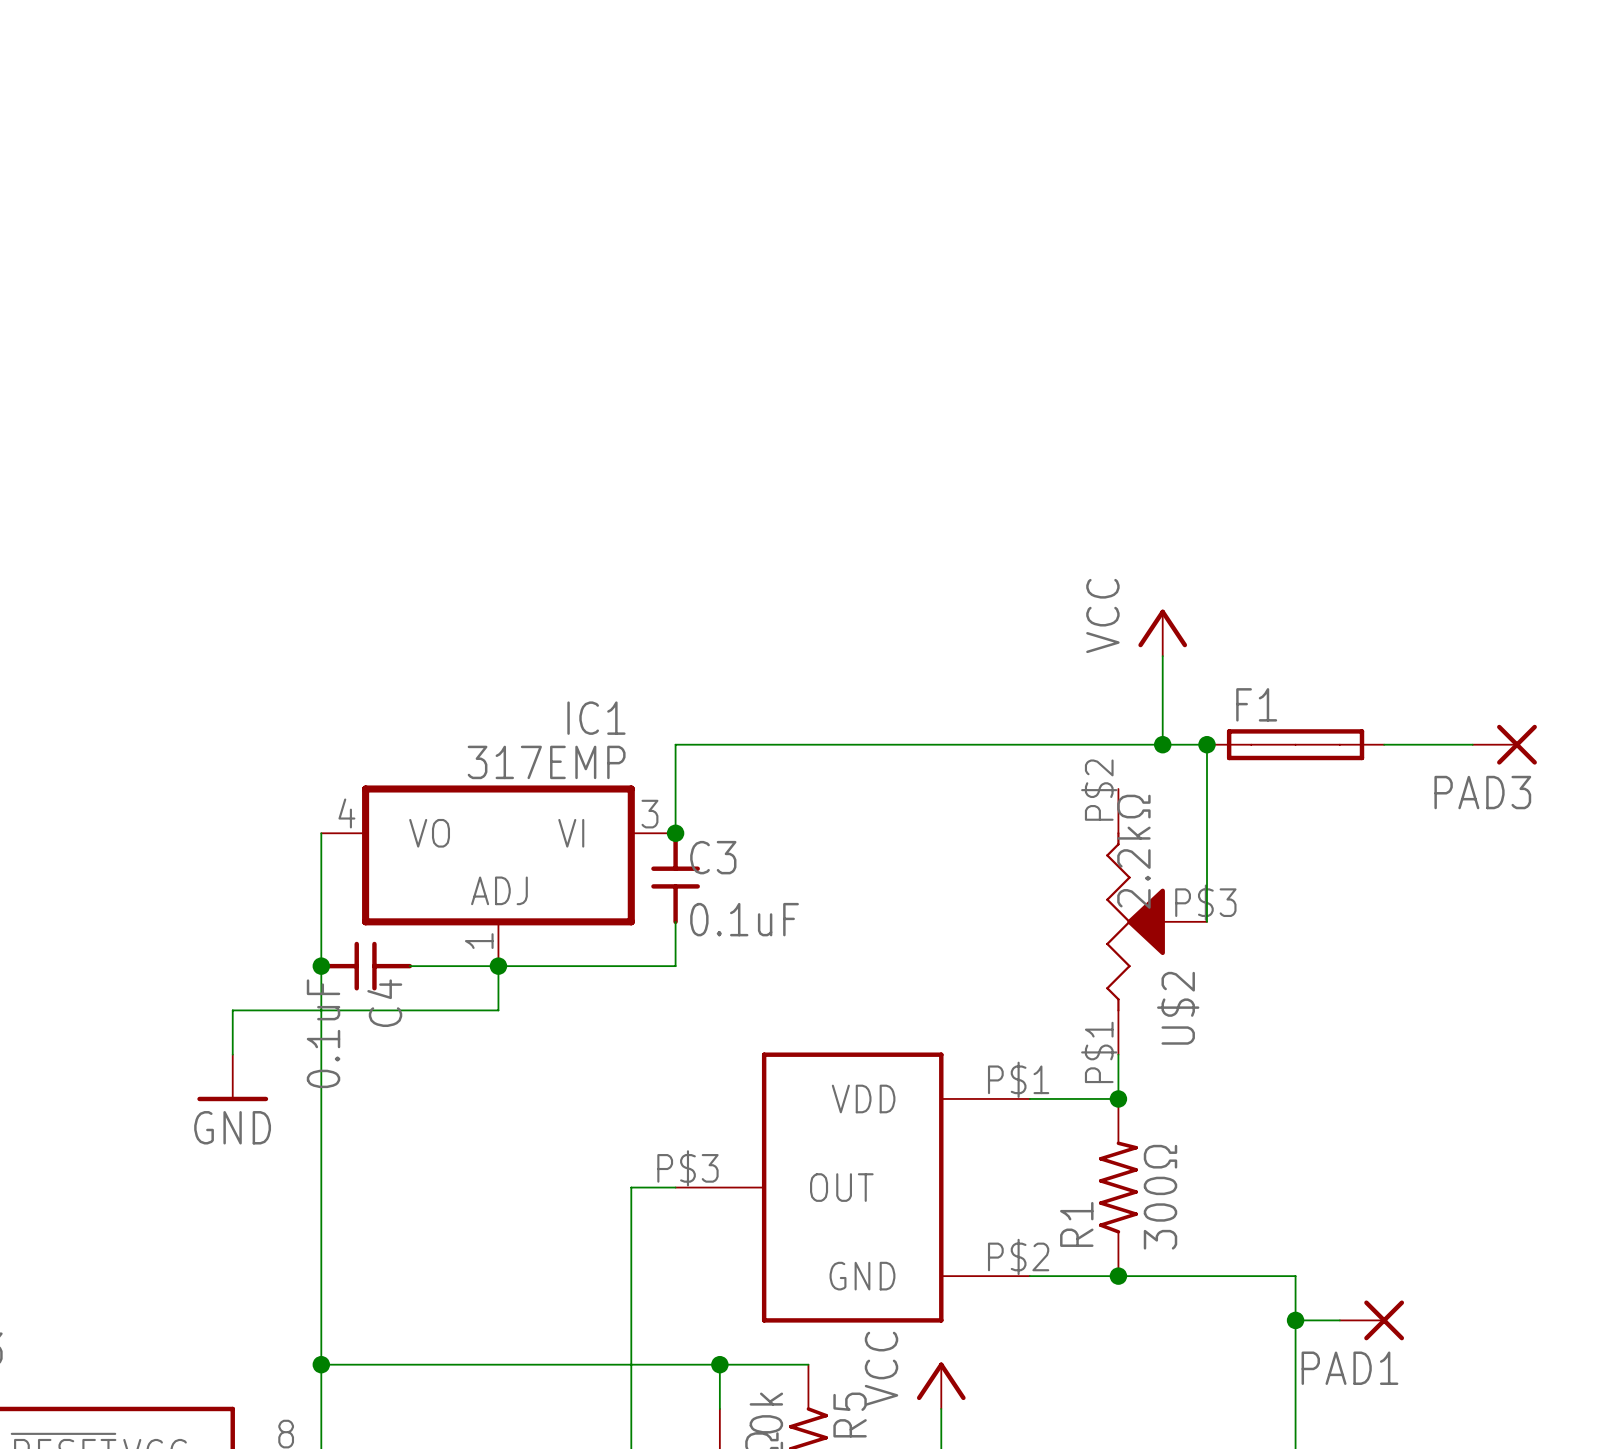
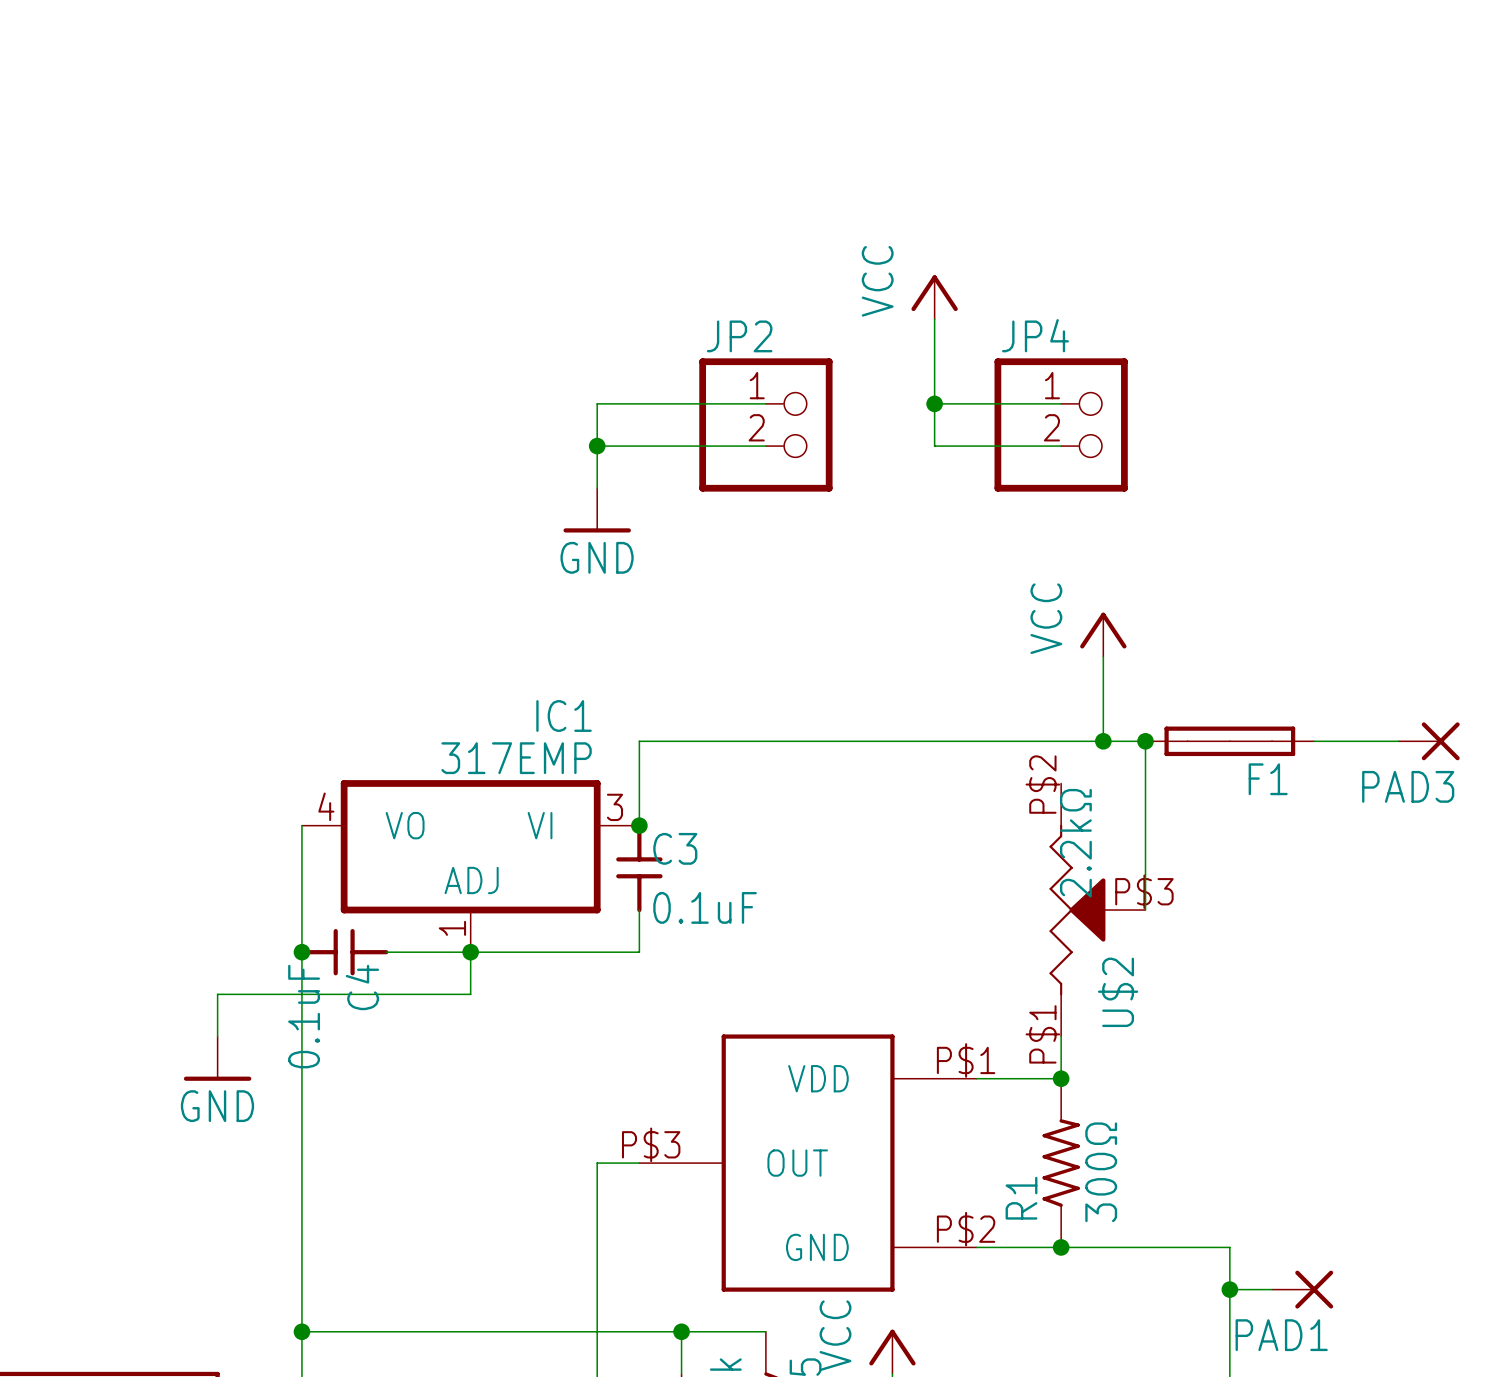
power symbol: none -> VCC (934, 297)
wire: none -> (934, 319) (934, 446) (1061, 446)
wire: none -> (765, 403) (597, 403) (597, 488)
wire: none -> (934, 403) (1061, 403)
junction: none -> (934, 403)
JP2: none -> (765, 424)
JP4: none -> (1061, 424)
wire: none -> (597, 446) (765, 446)
junction: none -> (597, 446)
power symbol: none -> GND (597, 510)
F1 name position: F1 (1256, 704) -> F1 (1268, 779)

